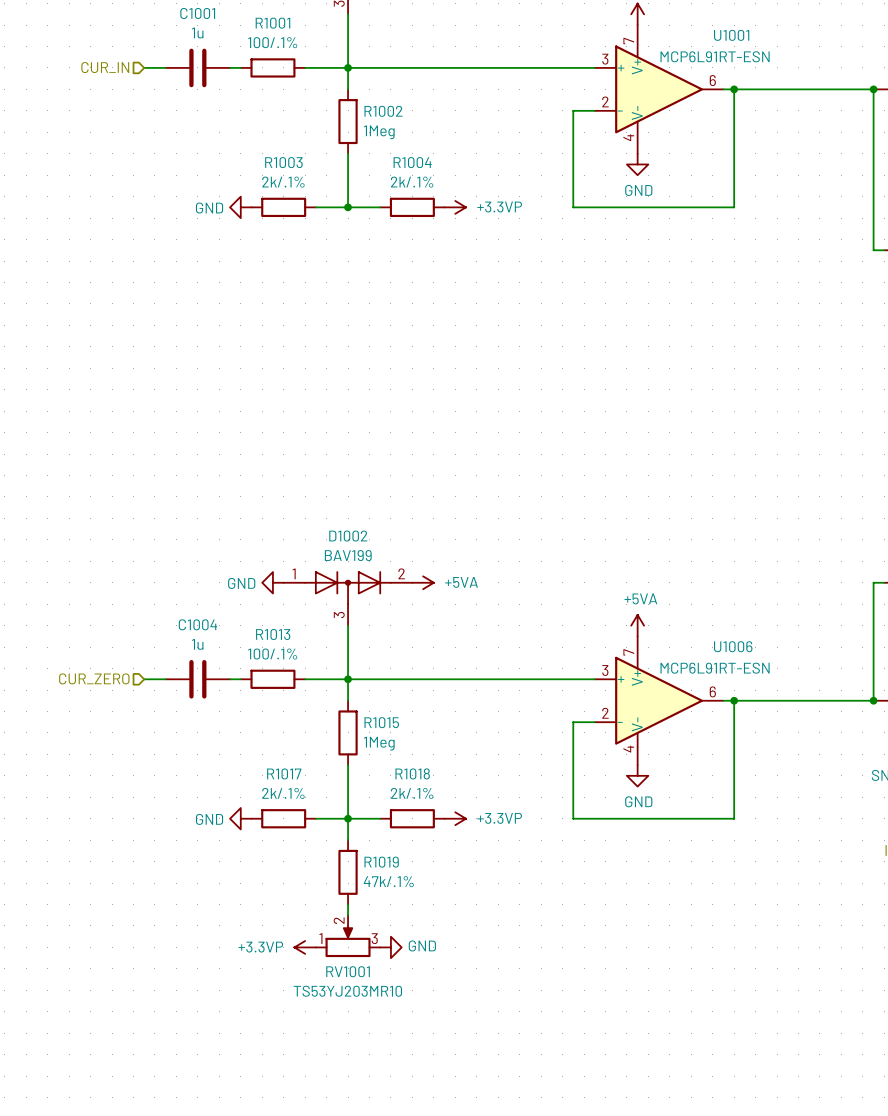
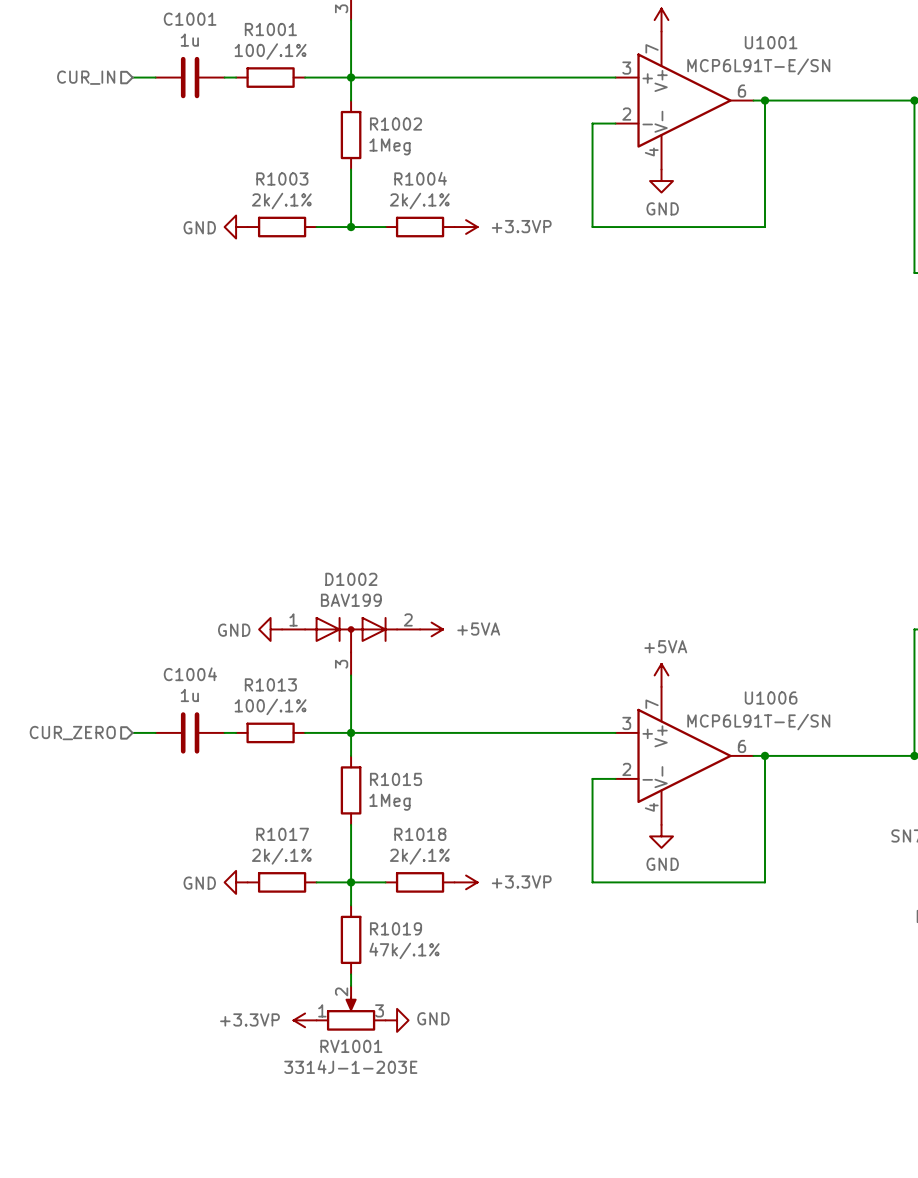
U1001 value: MCP6L91RT-ESN (715, 56) -> MCP6L91T-E/SN (758, 66)
U1006 value: MCP6L91RT-ESN (715, 668) -> MCP6L91T-E/SN (758, 722)
RV1001 value: TS53YJ203MR10 (347, 991) -> 3314J-1-203E (350, 1067)

